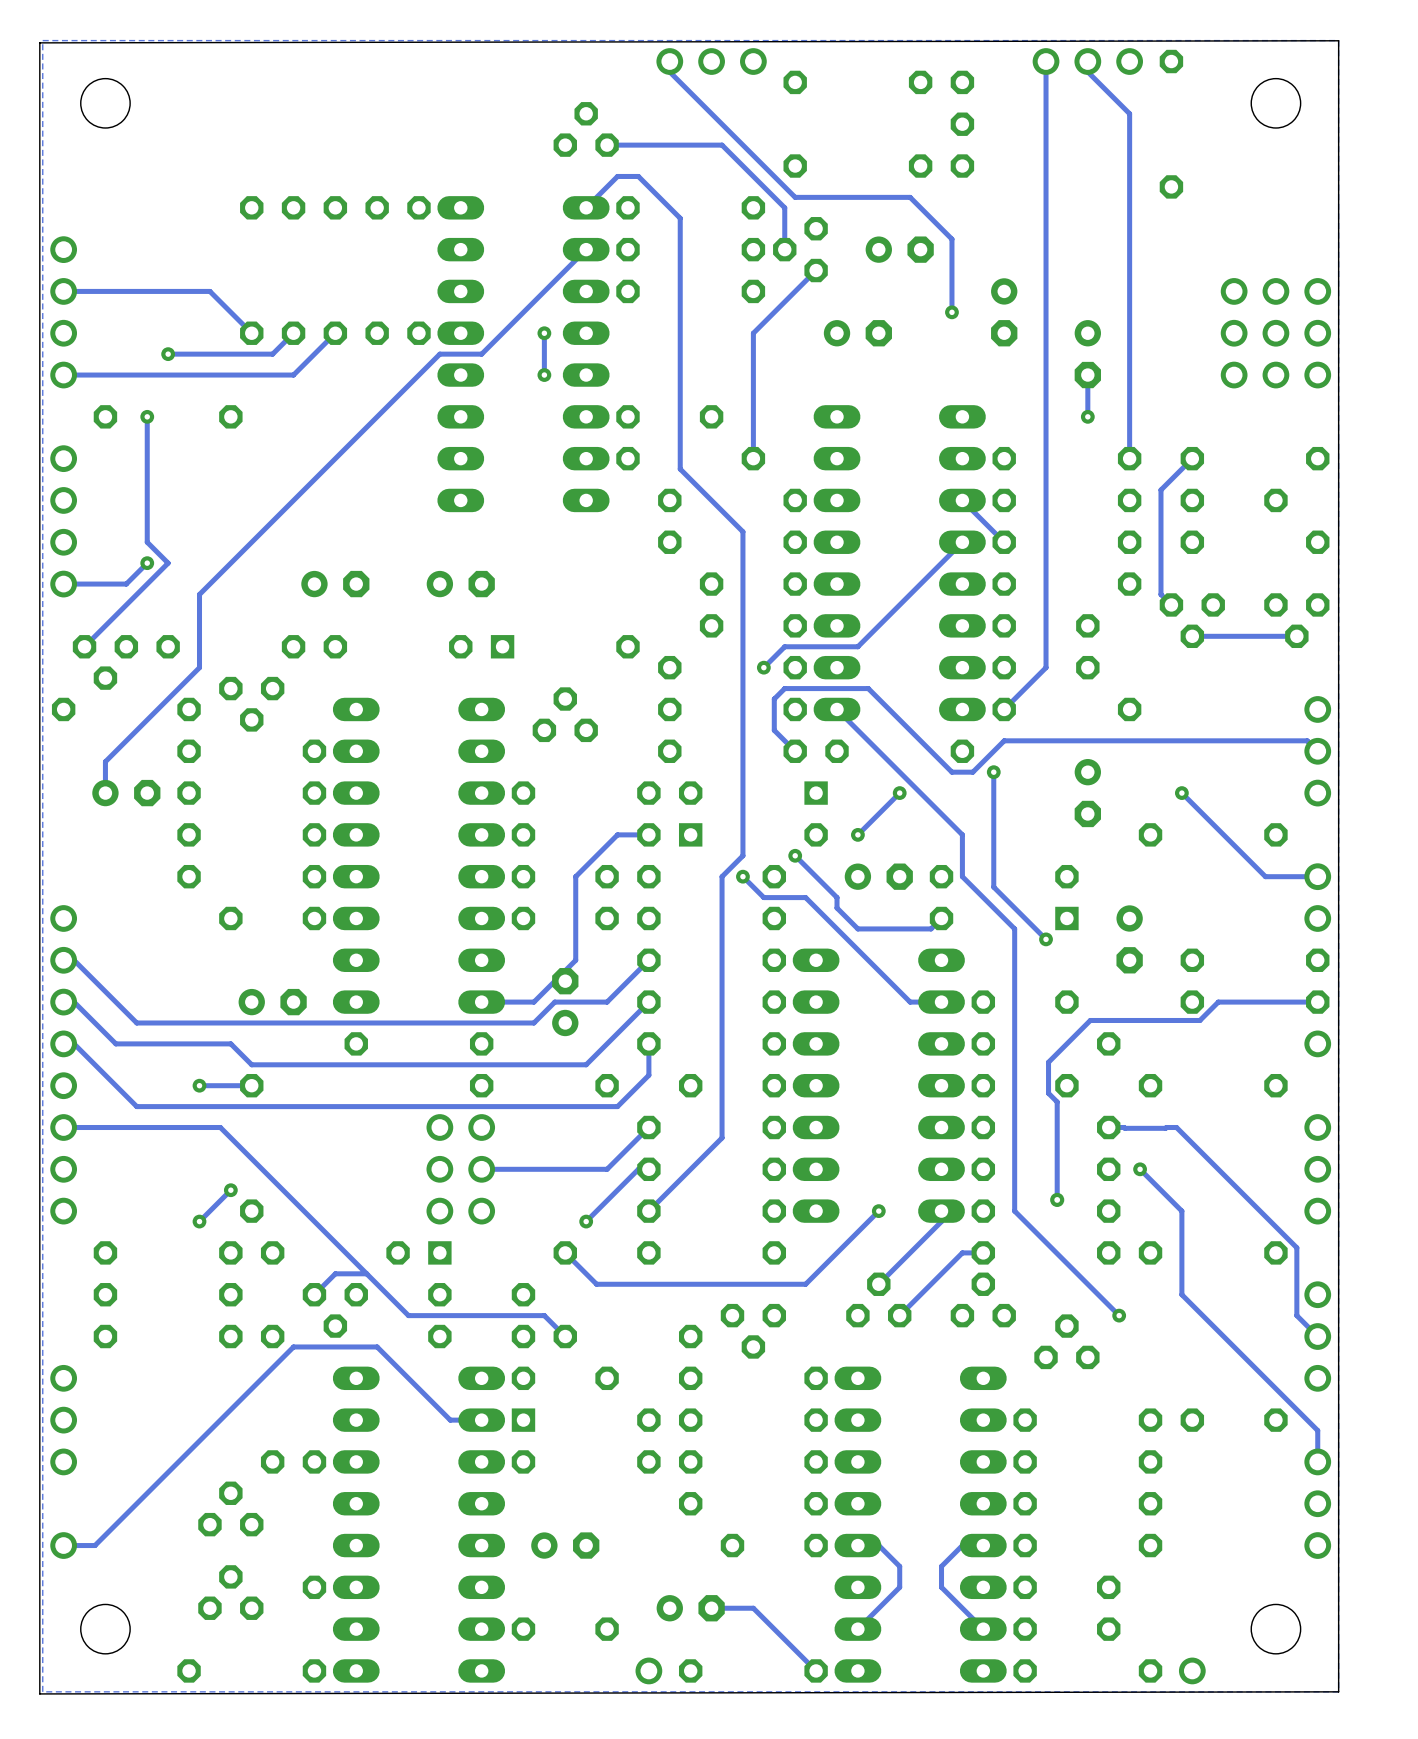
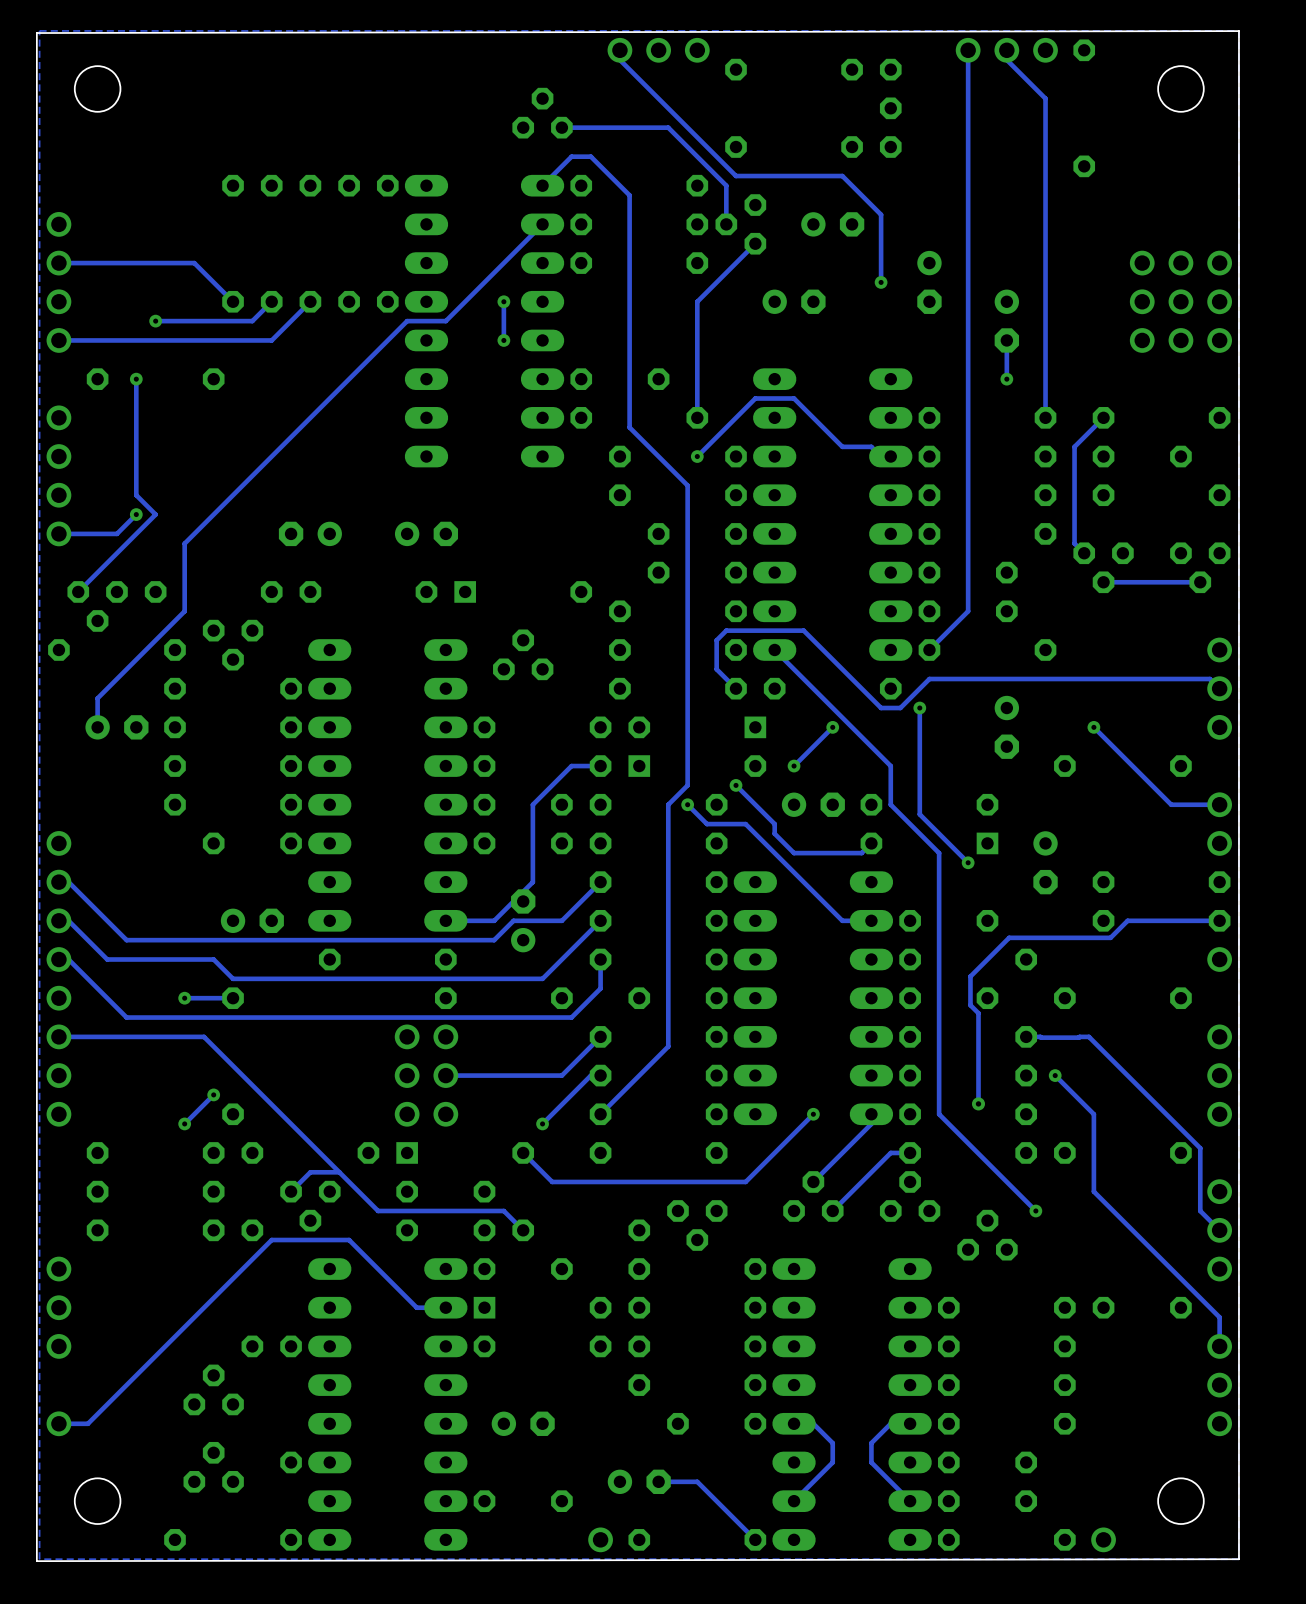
via: none -> (697, 456)
track: (962, 500) (1004, 542) -> (890, 456) (881, 456) (871, 446) (842, 446) (794, 398) (755, 398) (697, 456)
track: (962, 542) (857, 646) (784, 646) (763, 667) -> none
part rotation: 0° (335, 584) -> 180° (310, 533)
via: (763, 667) -> none

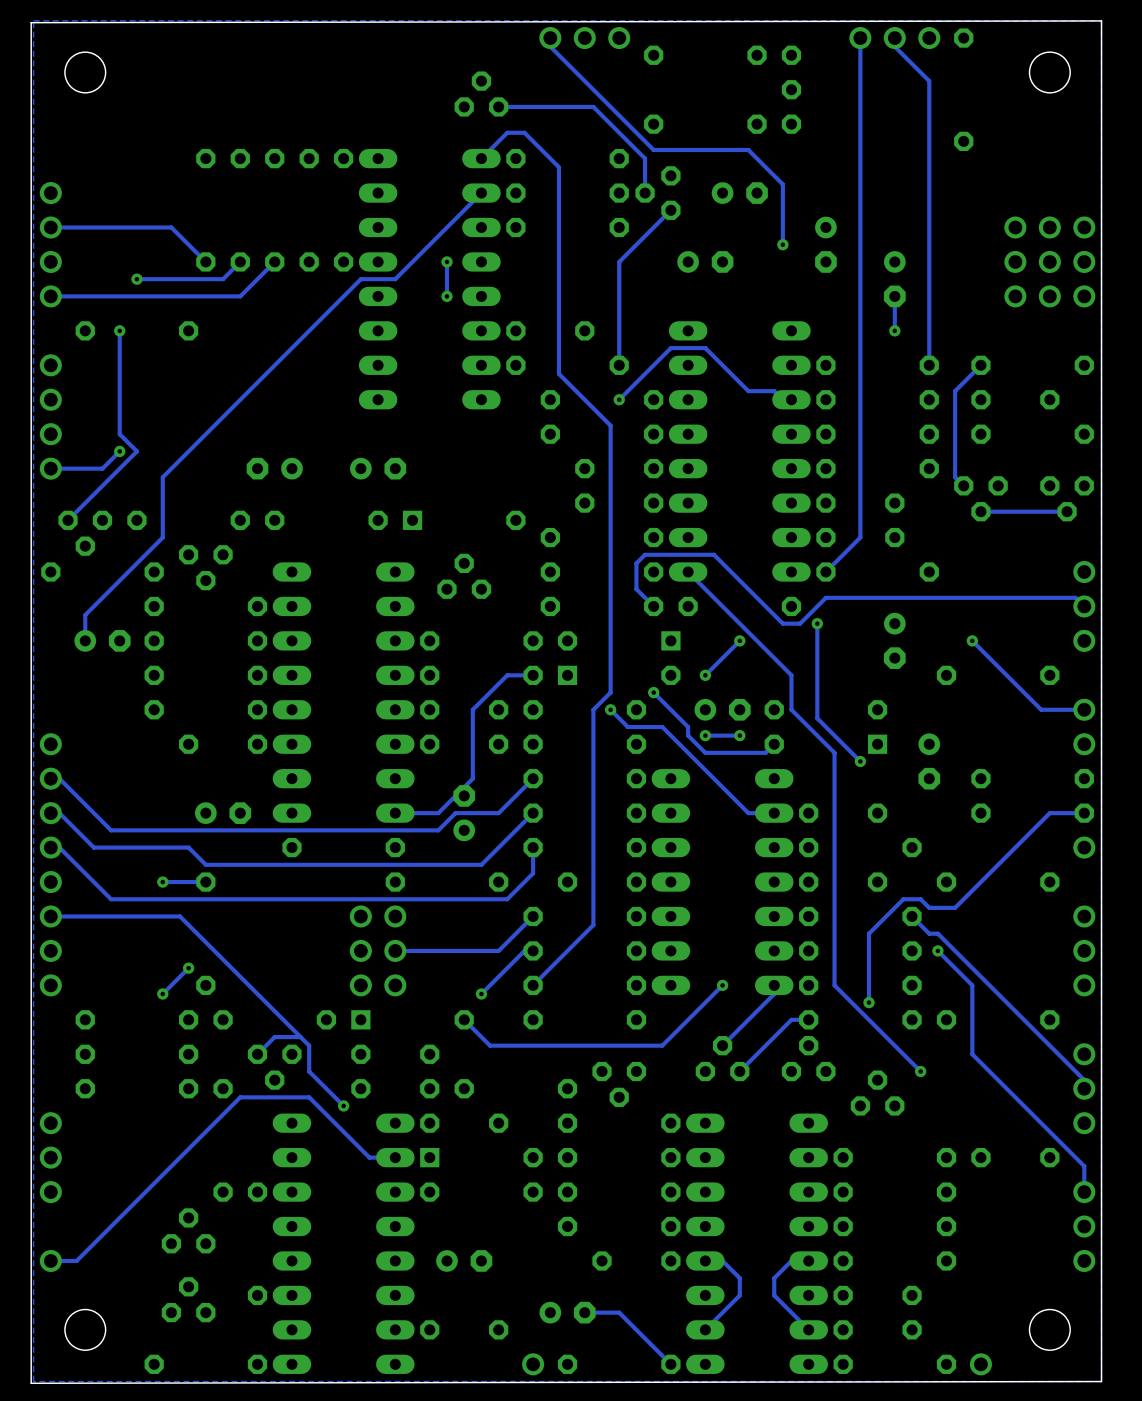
via: none -> (705, 735)
track: none -> (739, 735) (705, 735)
via: none -> (739, 735)
track: (1180, 920) (1127, 920) (1110, 937) (1009, 937) (970, 976) (970, 1005) (978, 1013) (978, 1103) -> (1049, 813) (955, 907) (929, 907) (920, 899) (903, 899) (868, 933) (868, 1002)
track: (1026, 1036) (1088, 1036) (1200, 1148) (1200, 1210) (1219, 1230) -> (912, 916) (929, 933) (937, 933) (1084, 1080) (1084, 1088)
via: (978, 1103) -> none
via: none -> (868, 1002)
track: (349, 1181) (378, 1210) (503, 1210) (523, 1230) -> (309, 1045) (309, 1071) (343, 1105)
via: none -> (343, 1105)

